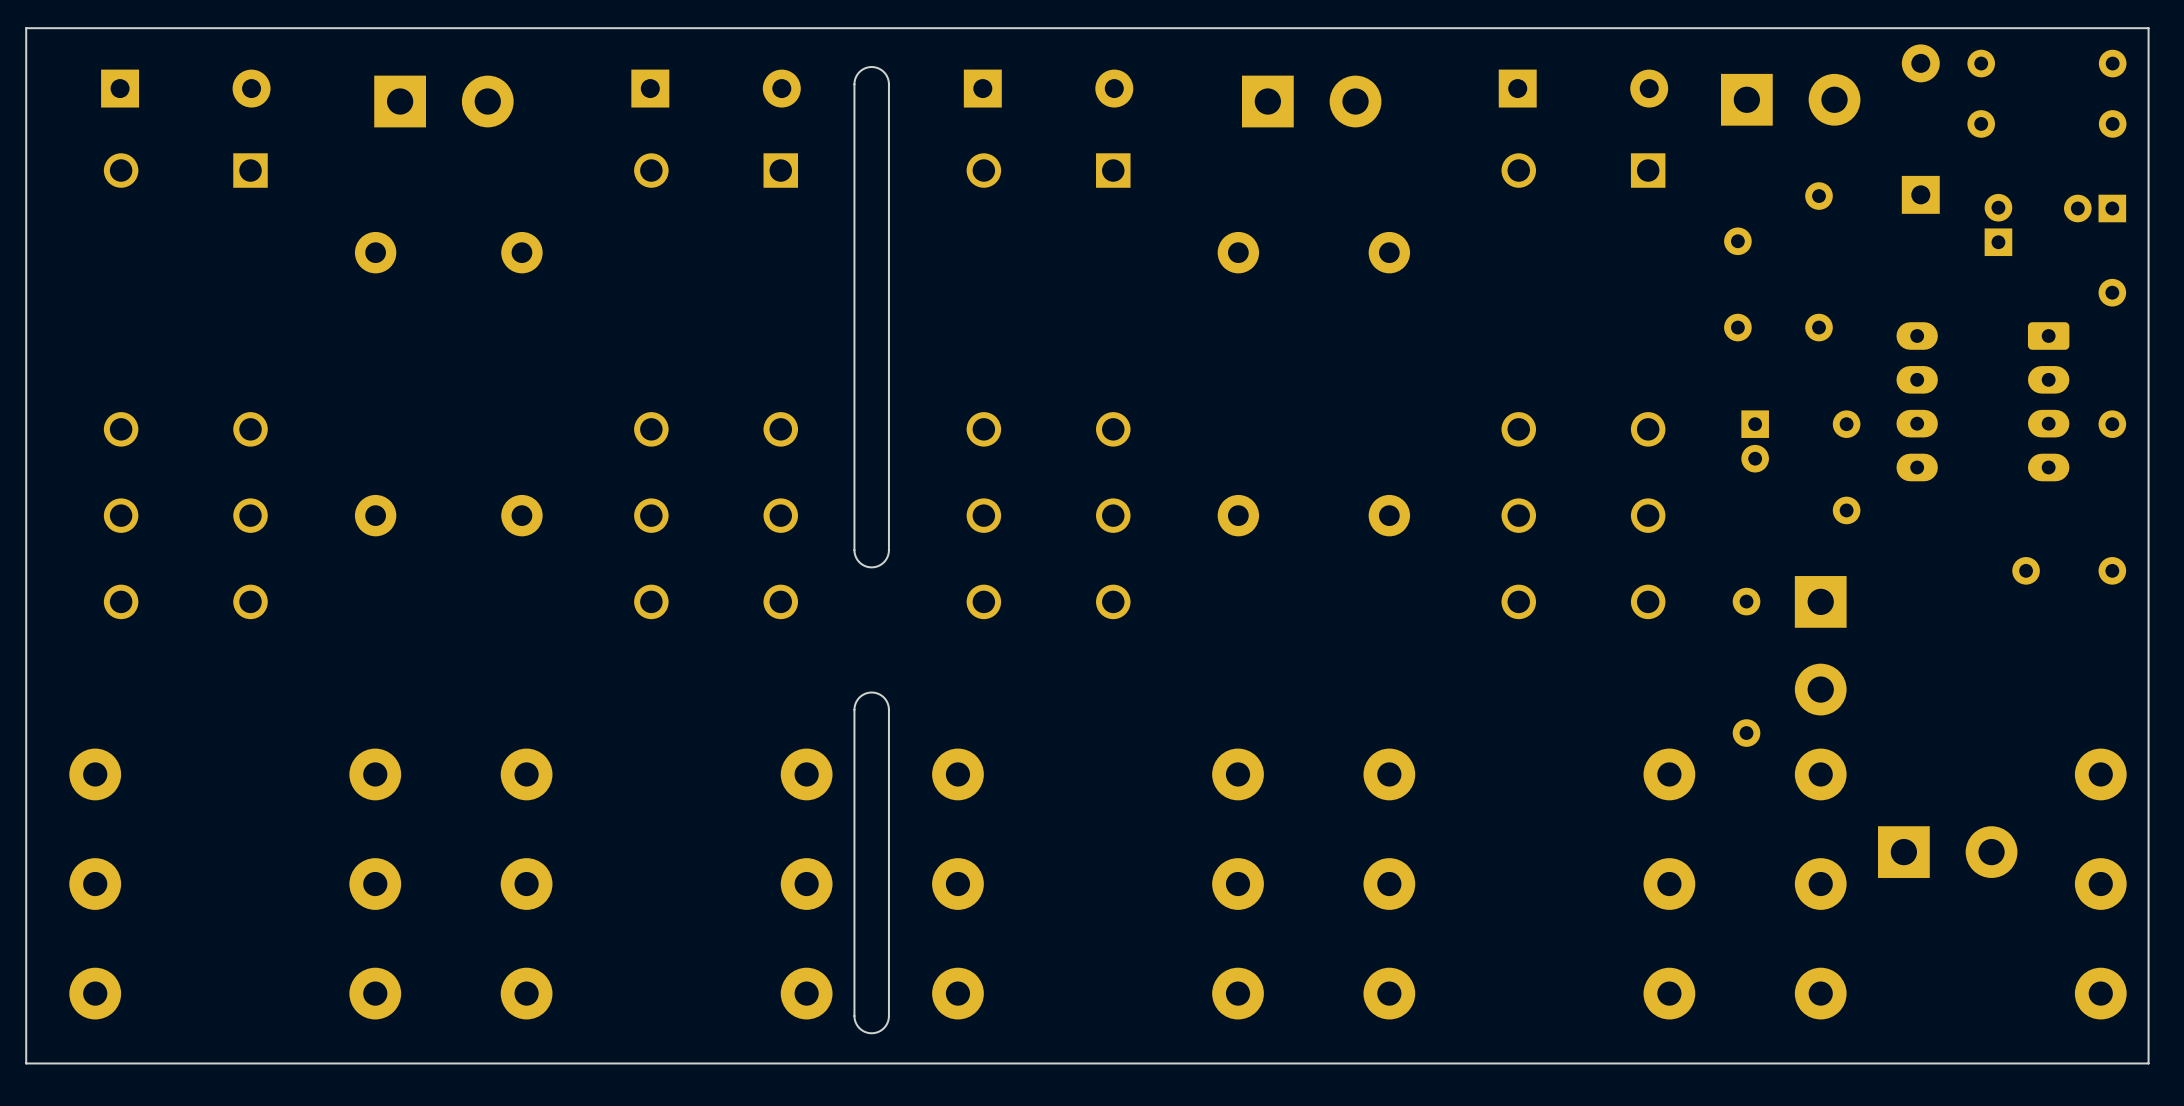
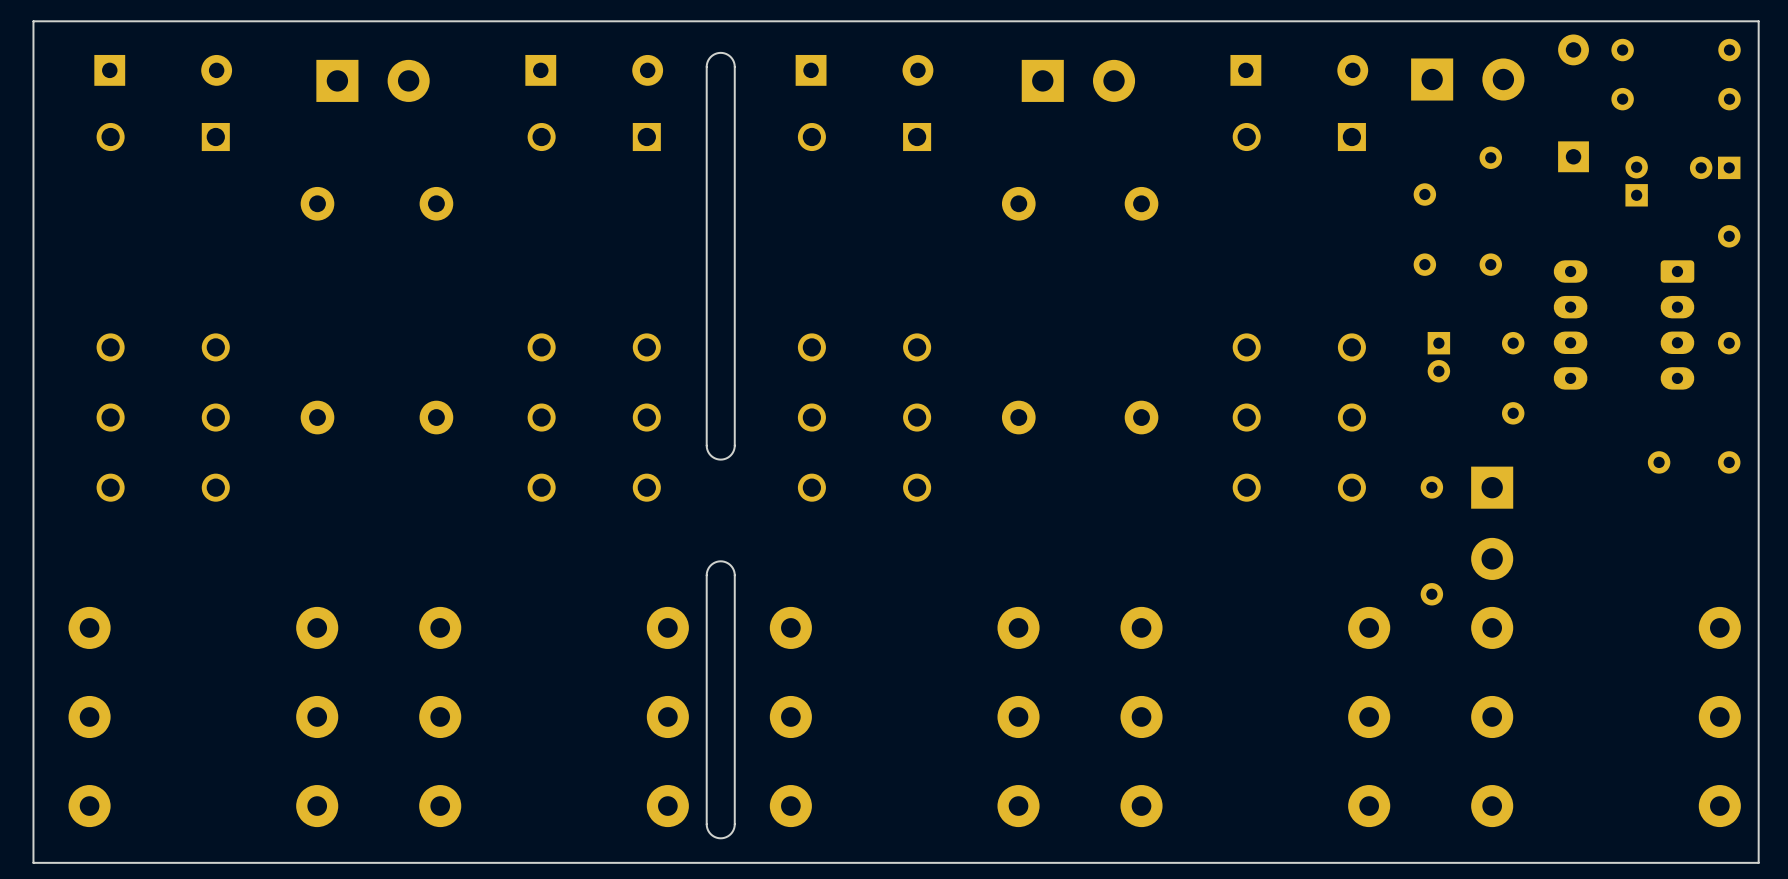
part: (1947, 852) -> none

